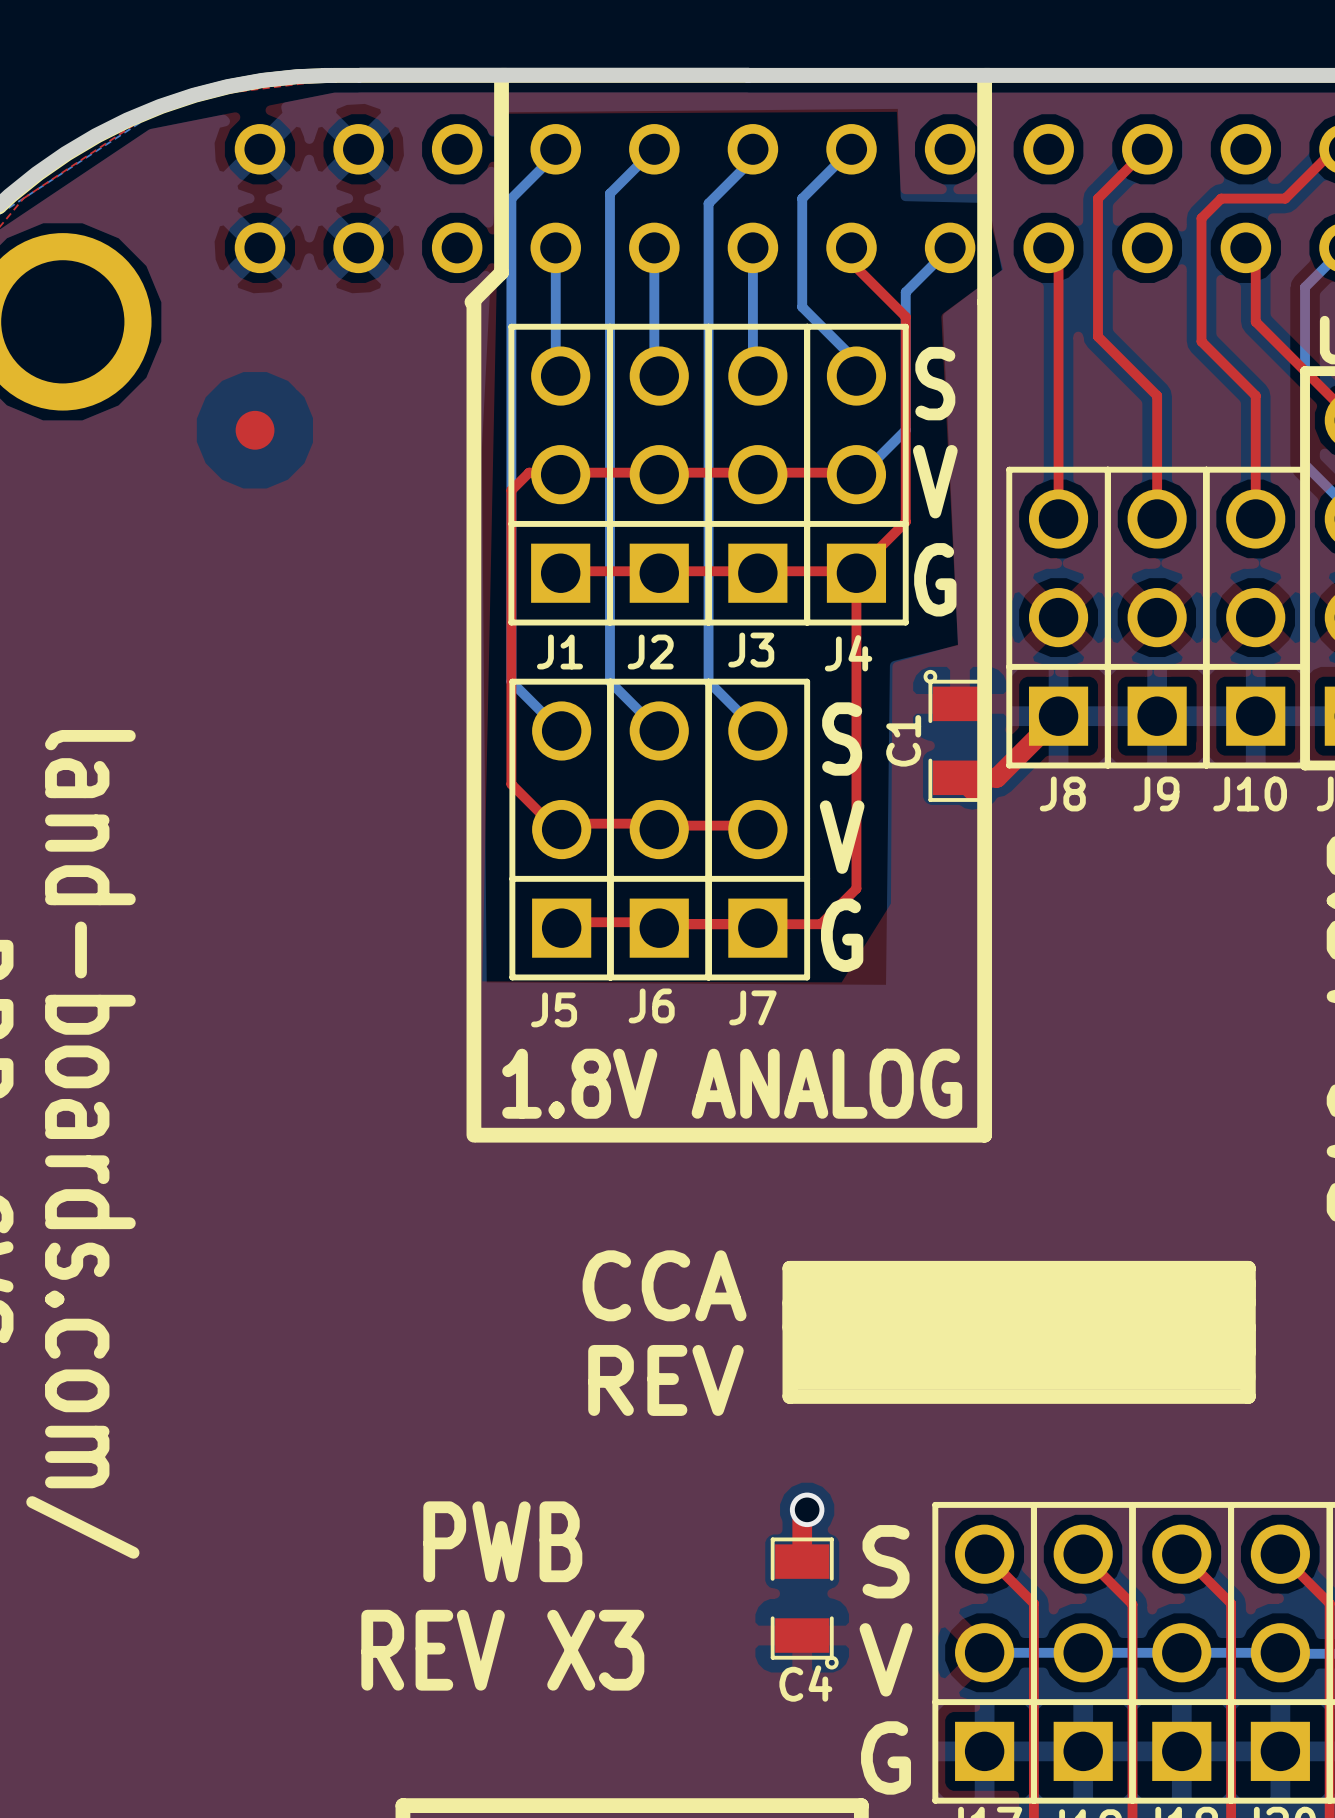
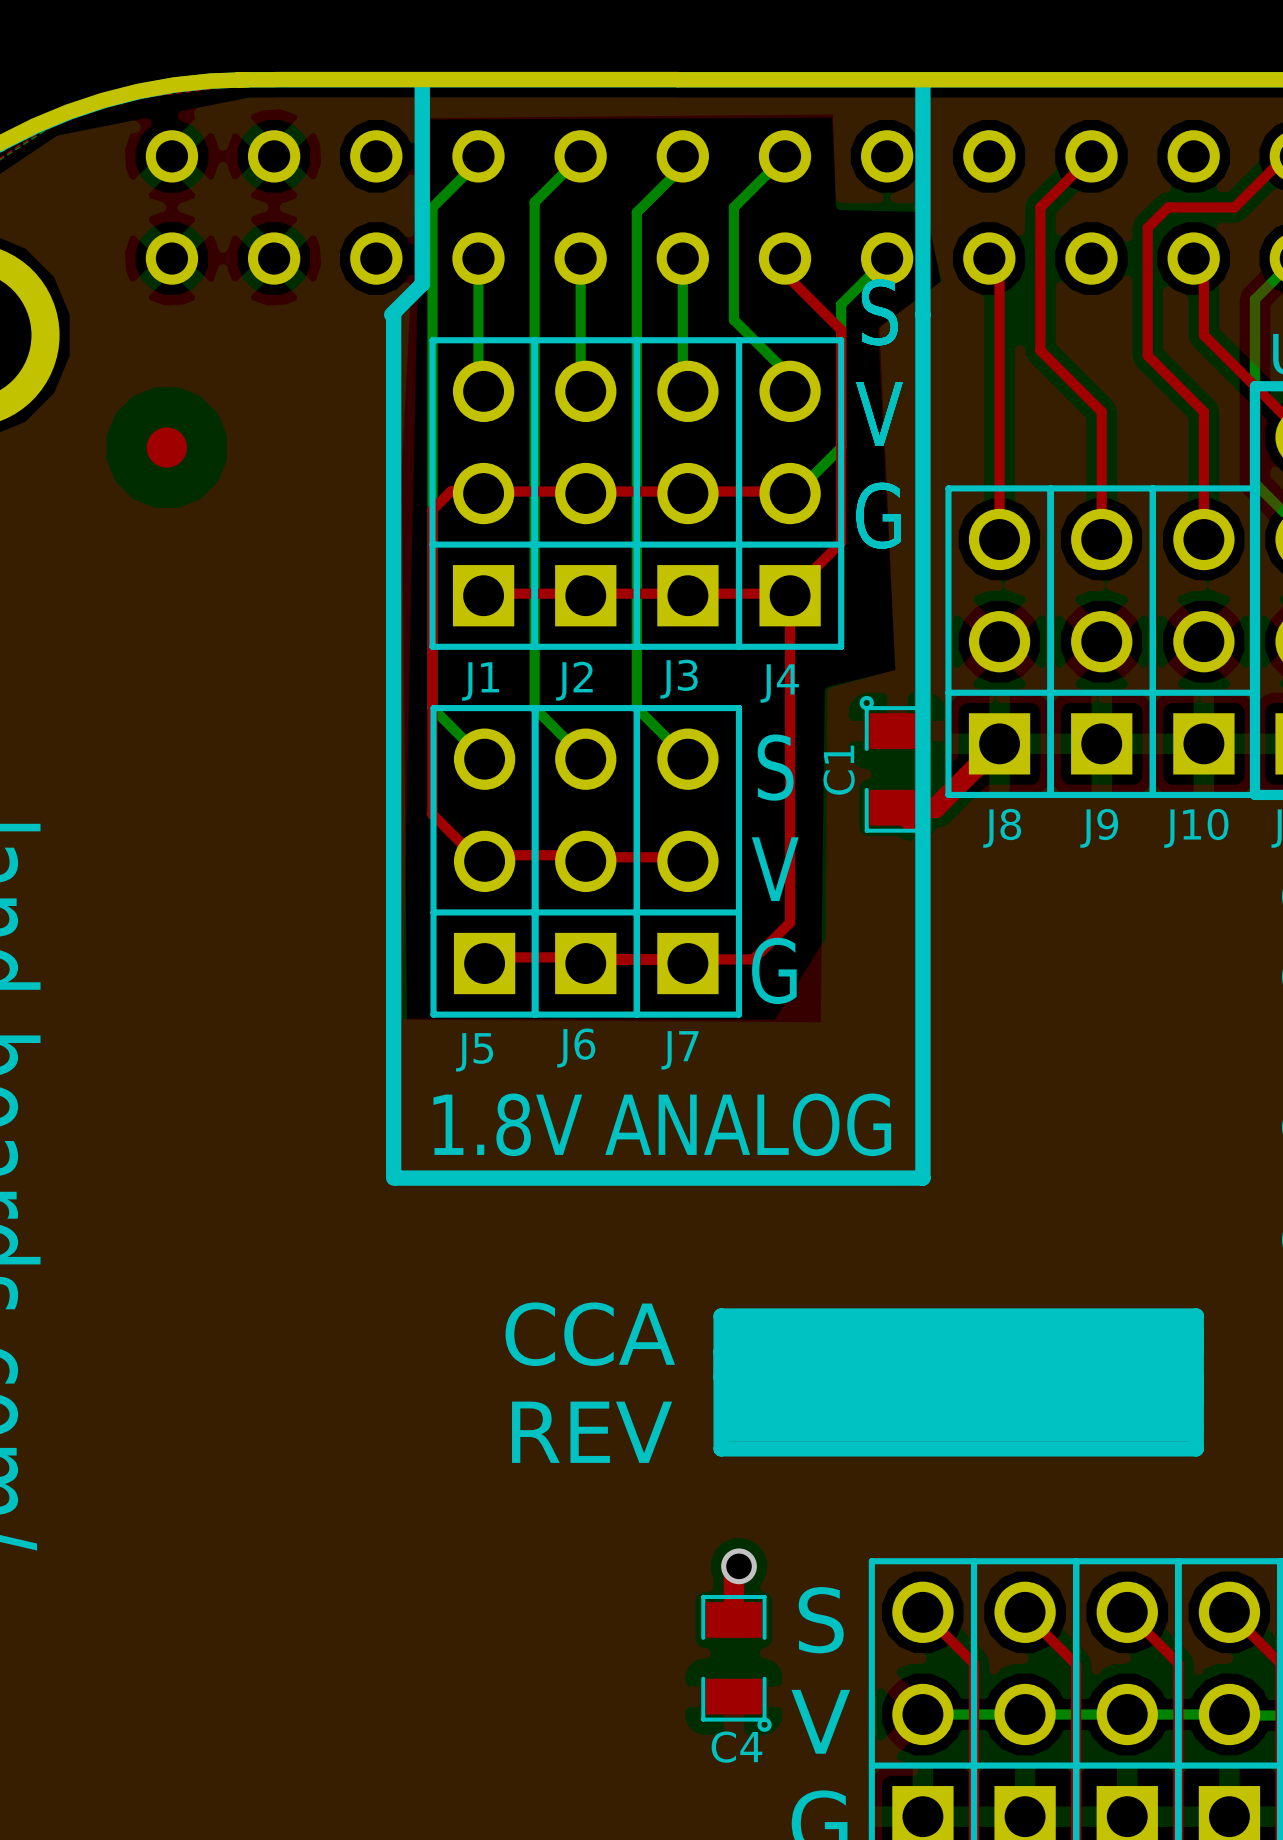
text position: S (935, 383) -> S (879, 312)
text position: V (935, 481) -> V (879, 414)
text position: G (935, 579) -> G (878, 515)
text: PWB (502, 1541) -> none
text: REV X3 (502, 1650) -> none

